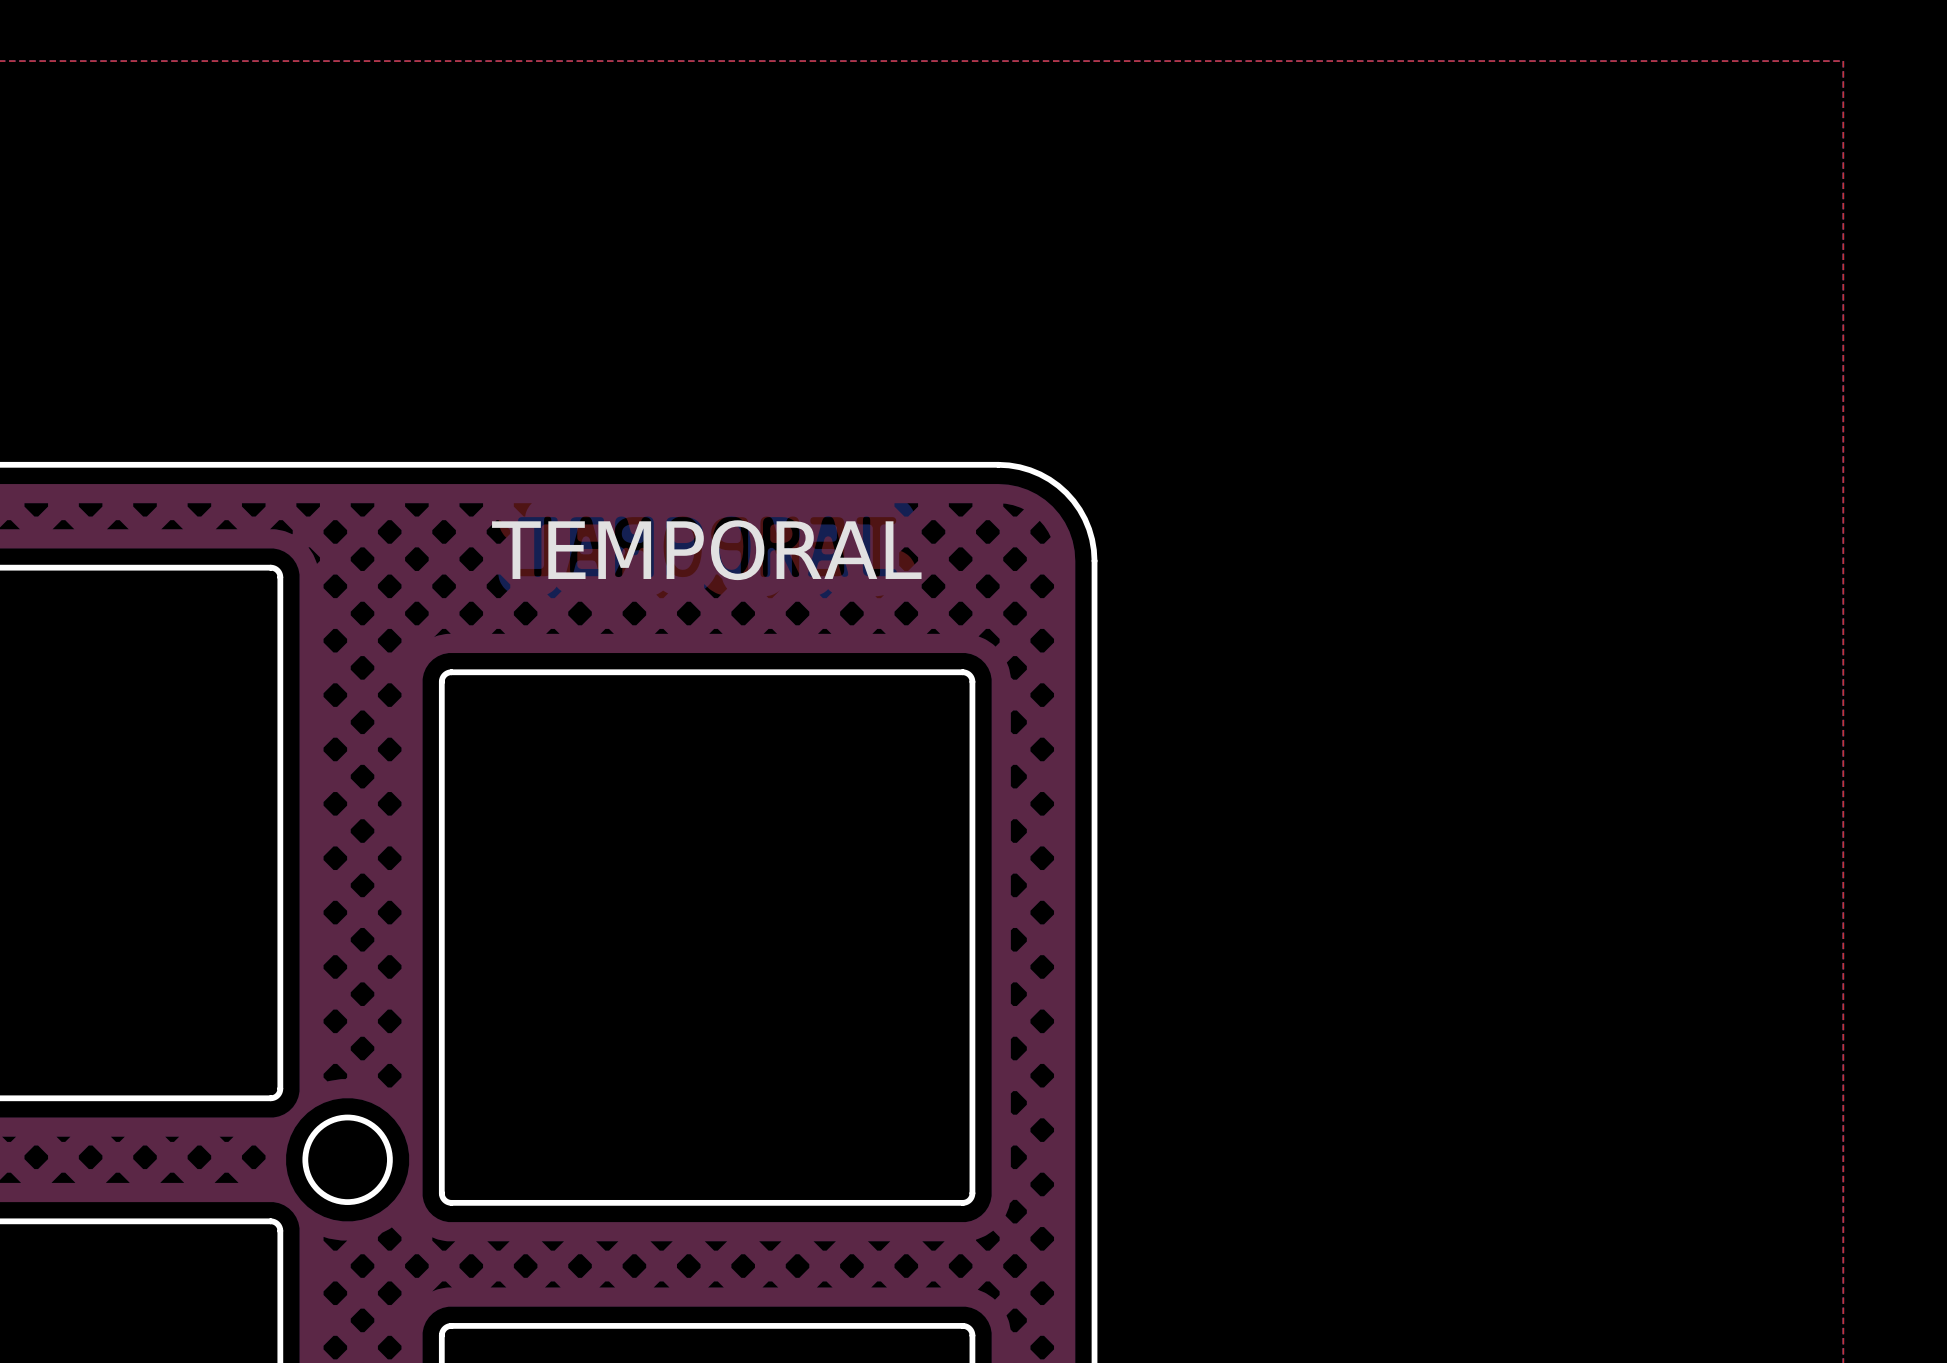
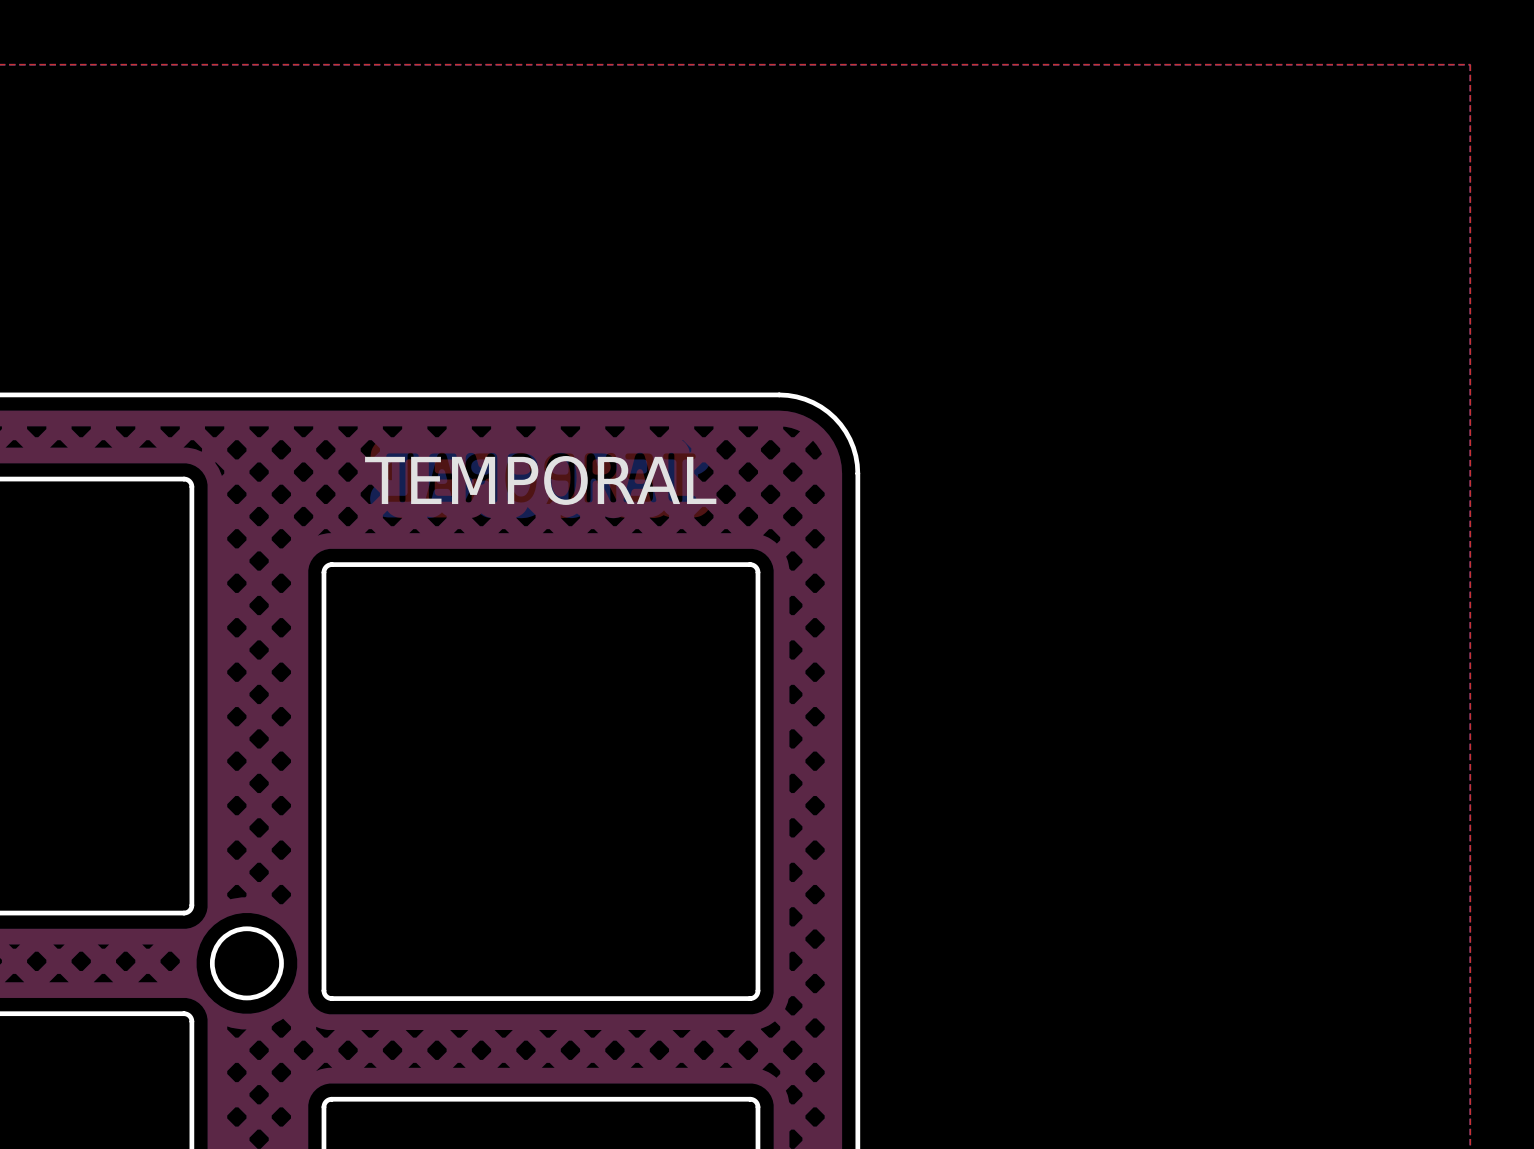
text position: TEMPORAL (706, 550) -> TEMPORAL (540, 480)

